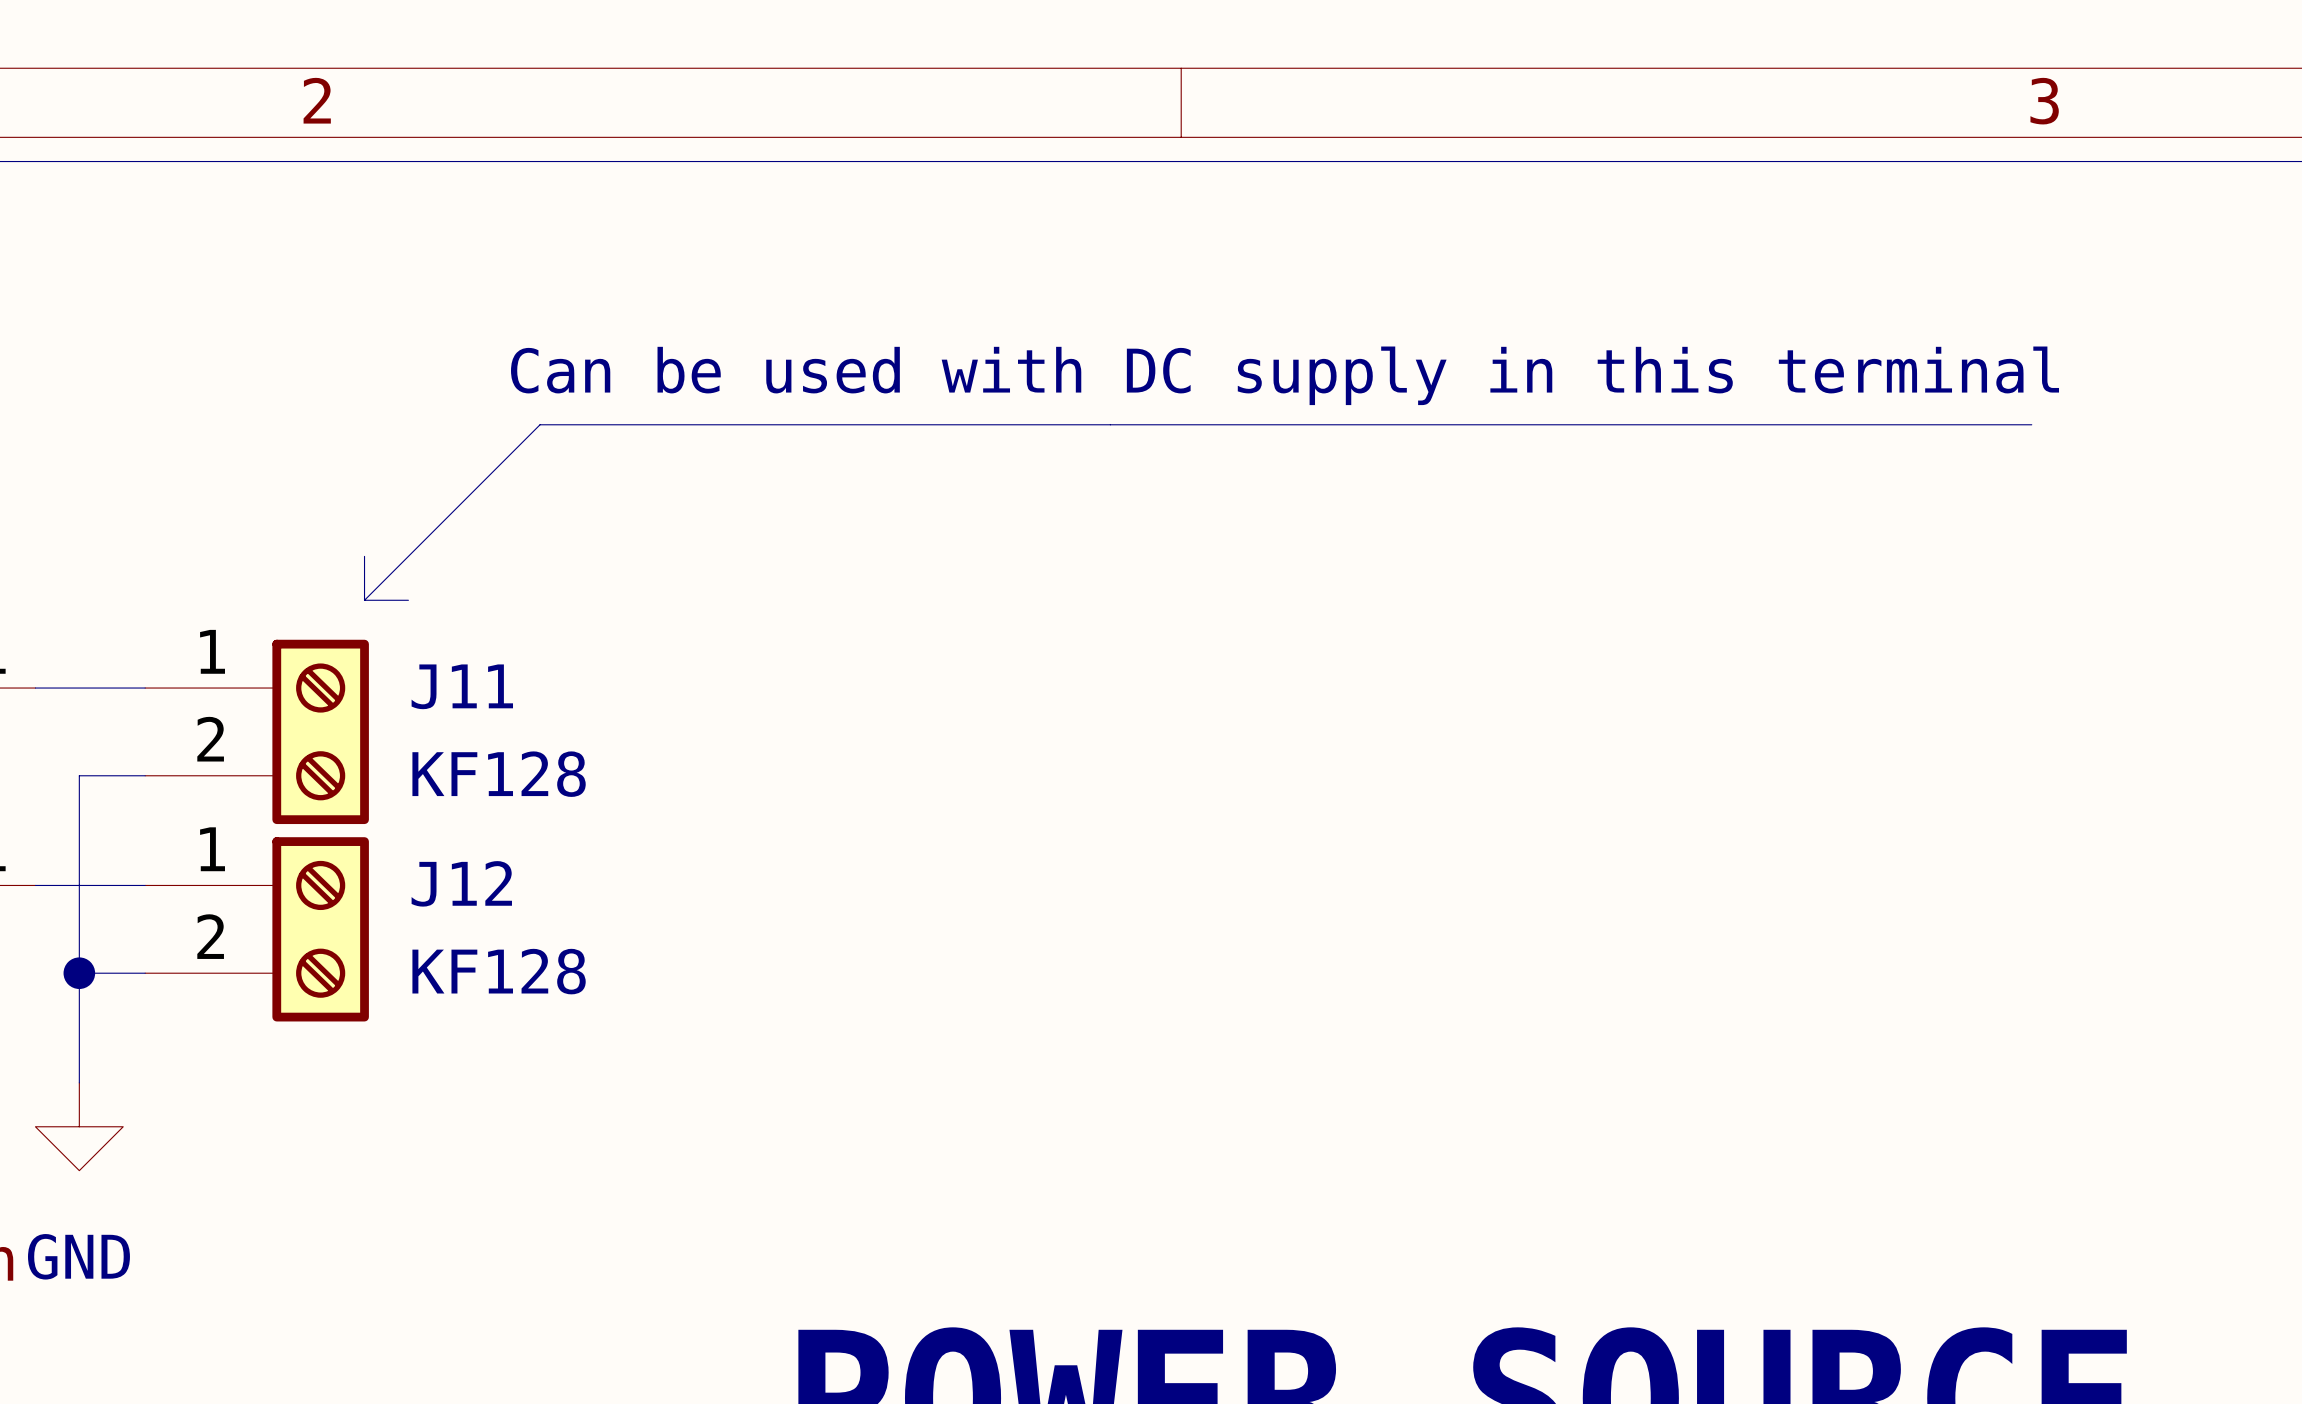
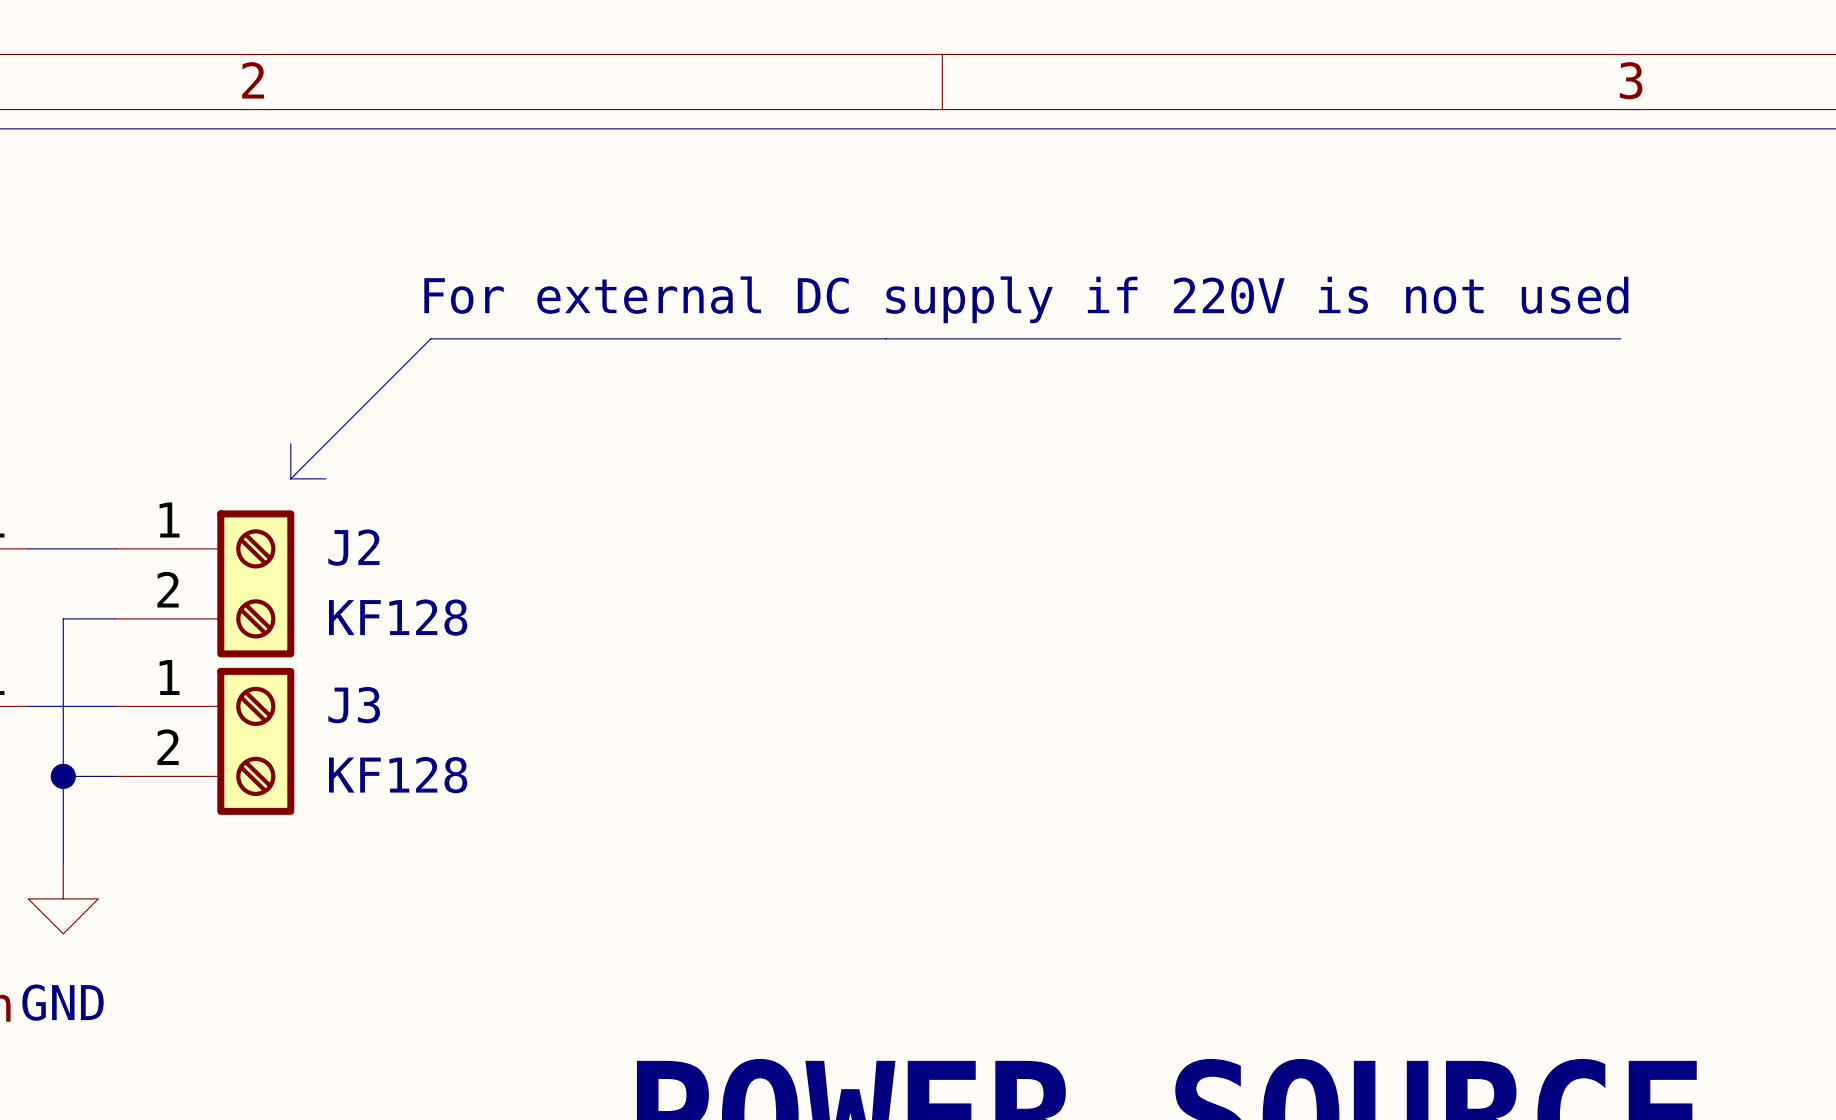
text: Can be used with DC supply in this terminal (1285, 375) -> For external DC supply if 220V is not used (1026, 299)
J11 name: J11 (462, 686) -> J2 (353, 547)
J12 name: J12 (461, 883) -> J3 (354, 705)

